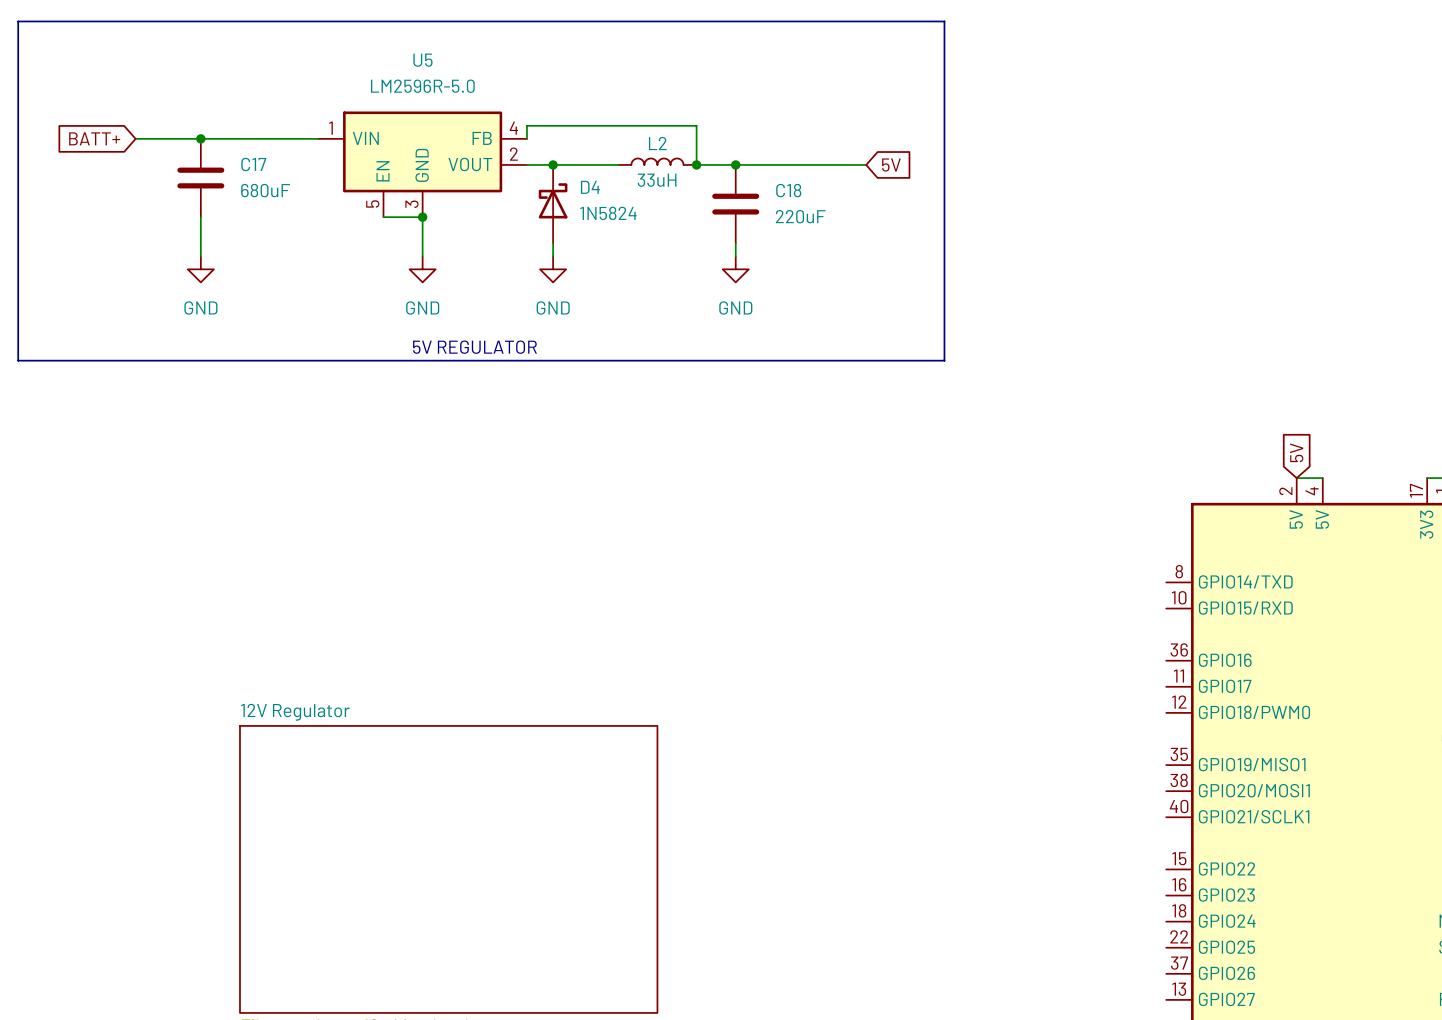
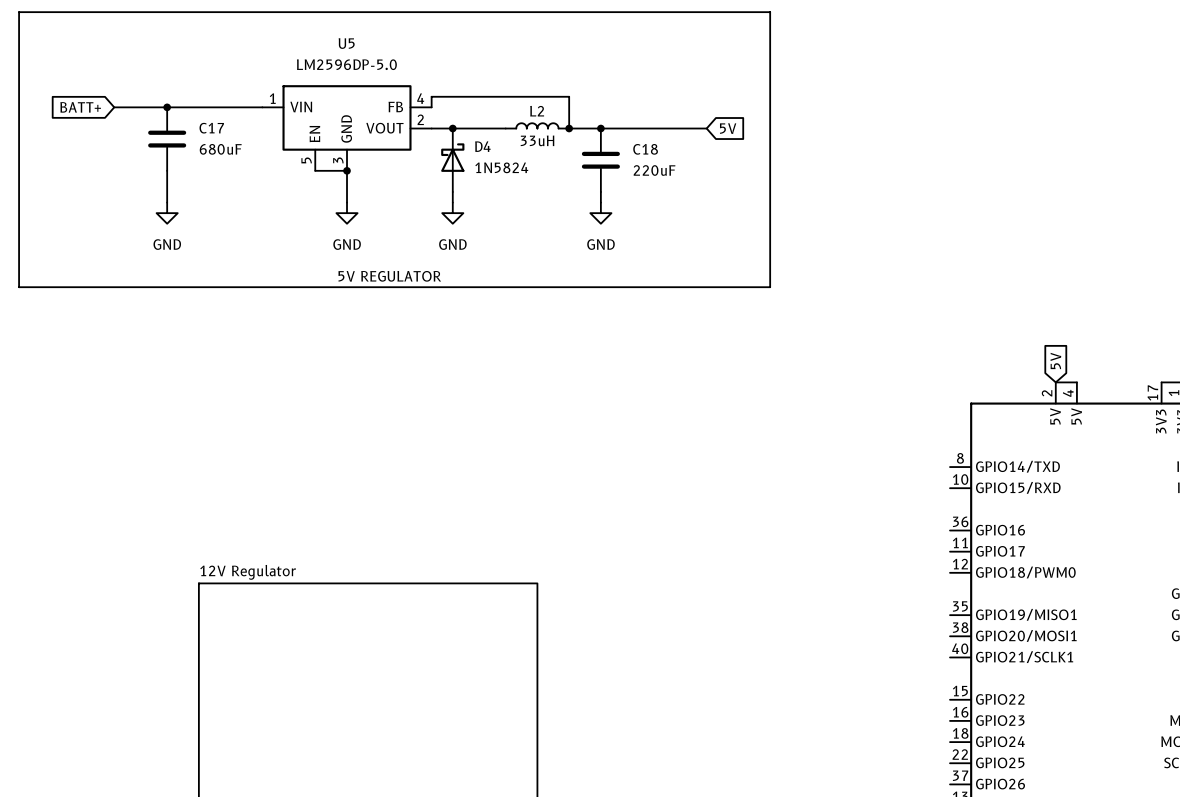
U5 value: LM2596R-5.0 (422, 86) -> LM2596DP-5.0 (346, 64)

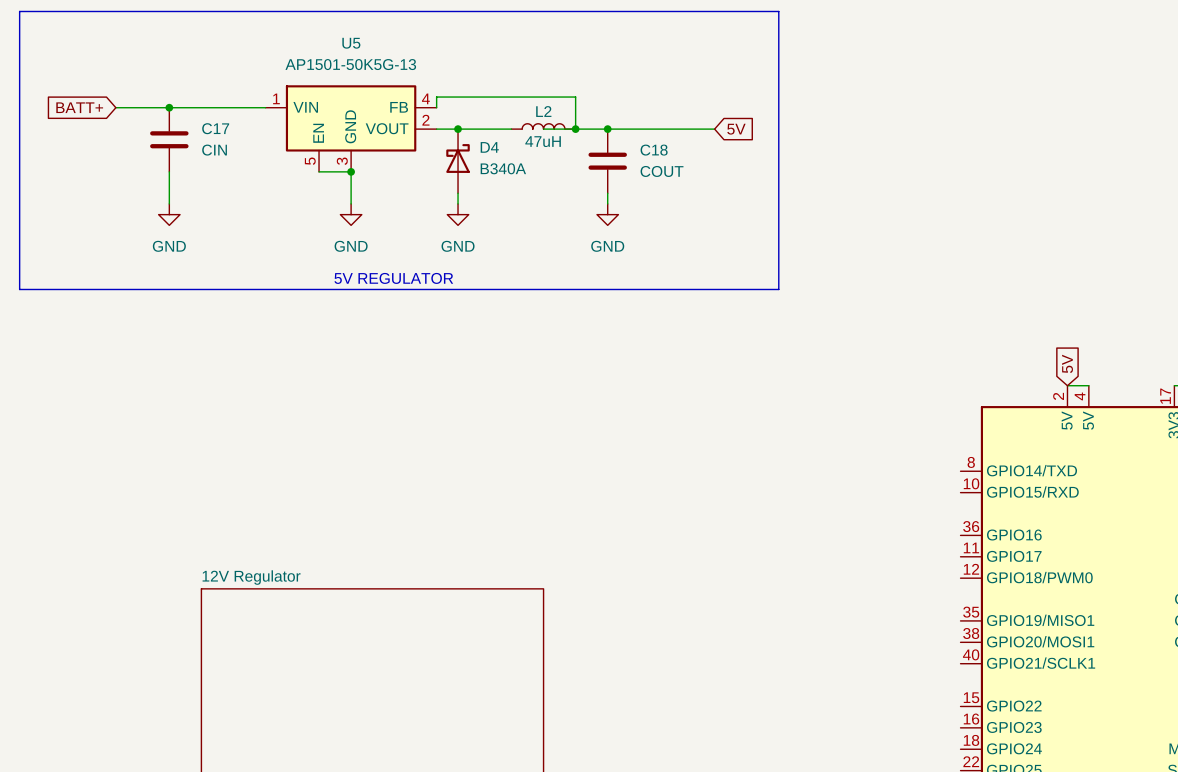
U5 value: LM2596DP-5.0 (346, 64) -> AP1501-50K5G-13 (350, 64)
wire: none -> (543, 129) (575, 129)
L2 value: 33uH (537, 140) -> 47uH (543, 141)
C17 value: 680uF (220, 149) -> CIN (214, 150)
D4 value: 1N5824 (501, 167) -> B340A (503, 168)
C18 value: 220uF (654, 170) -> COUT (662, 171)

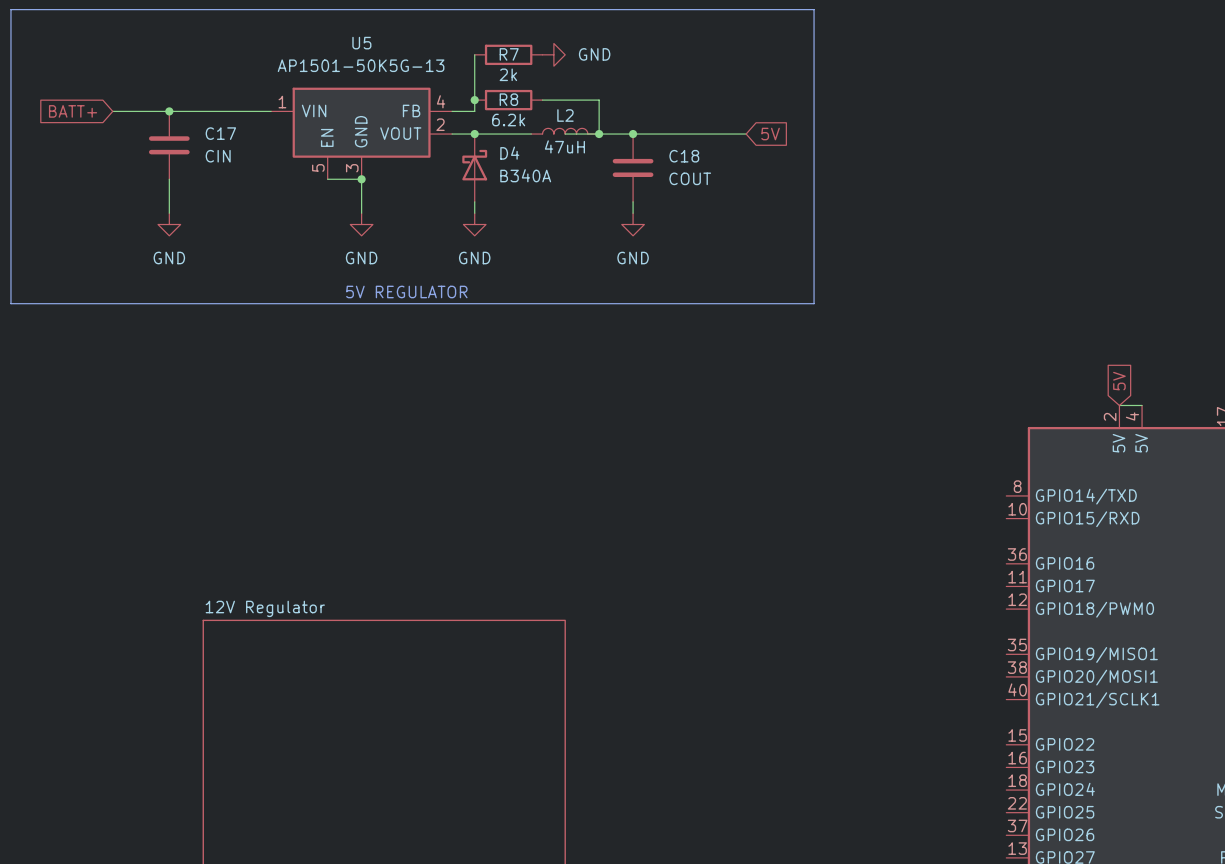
R7: none -> 2k (508, 54)
power symbol: none -> GND (553, 54)
junction: none -> (474, 100)
R8: none -> 6.2k (508, 100)
wire: (522, 97) (436, 97) (436, 107) -> (474, 54) (474, 111) (452, 111)

